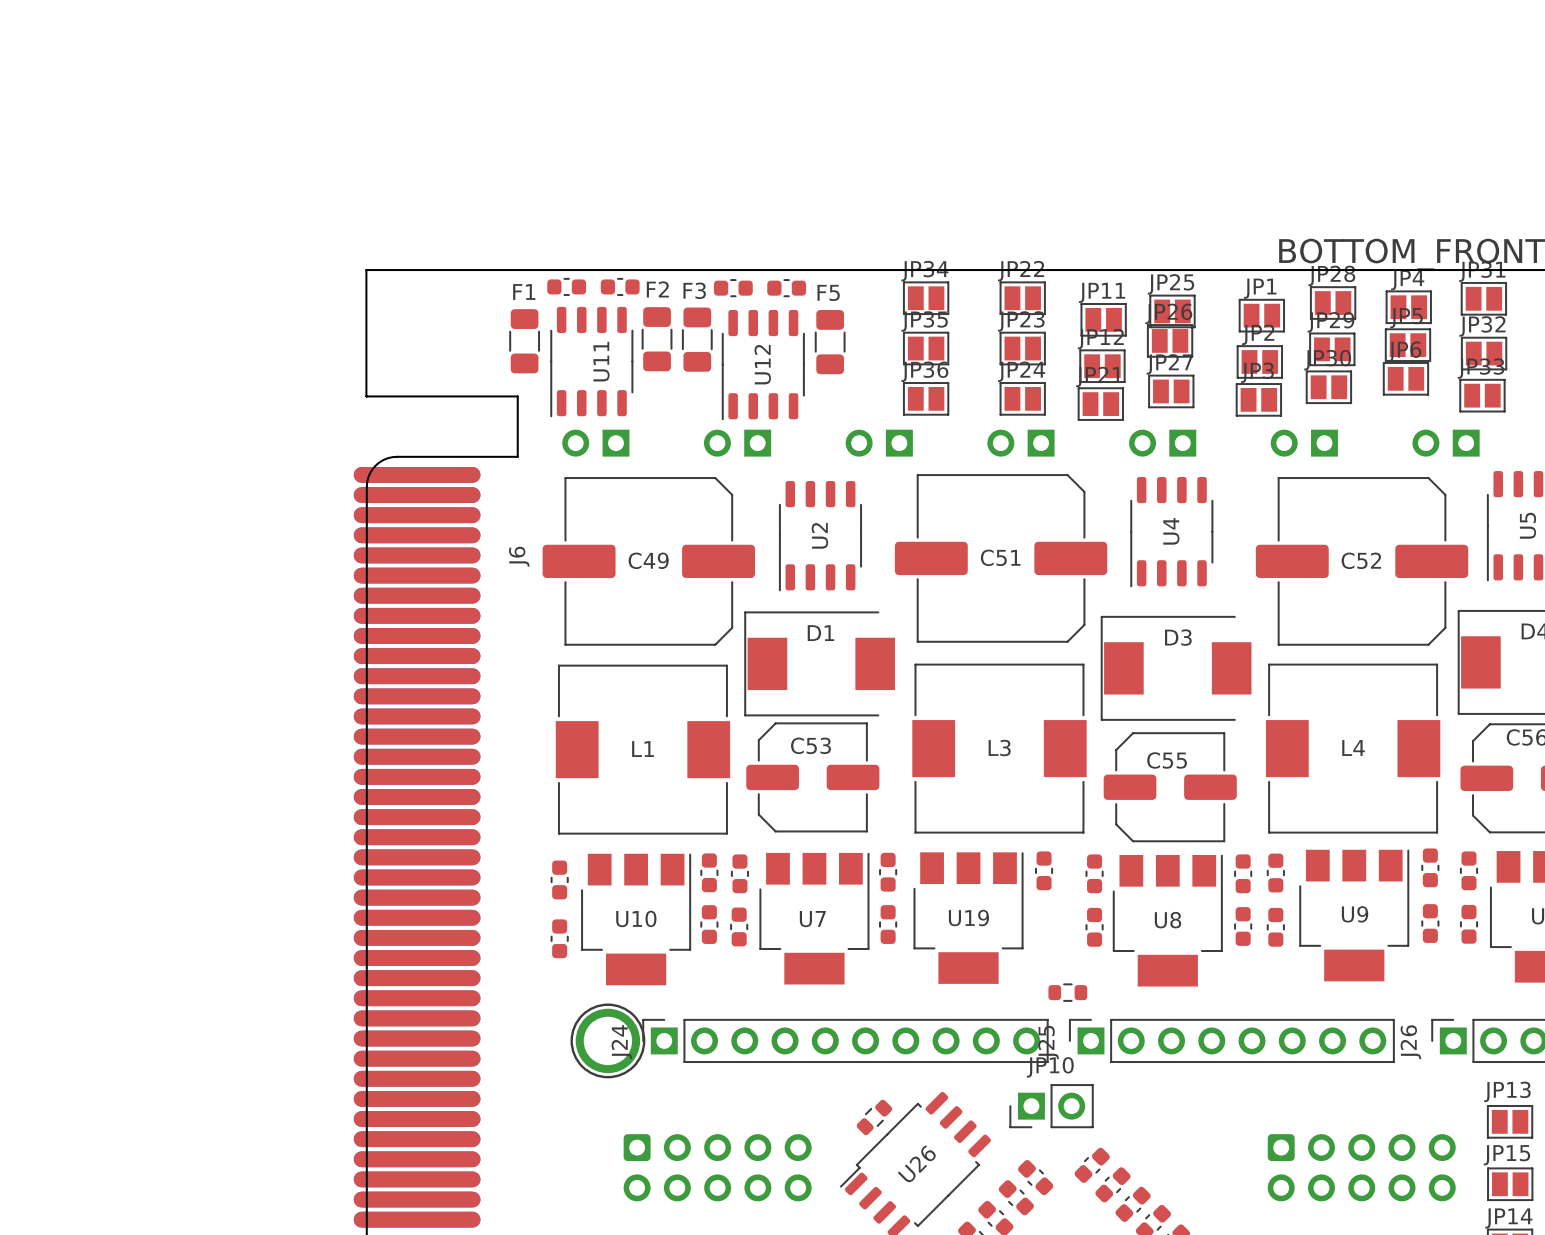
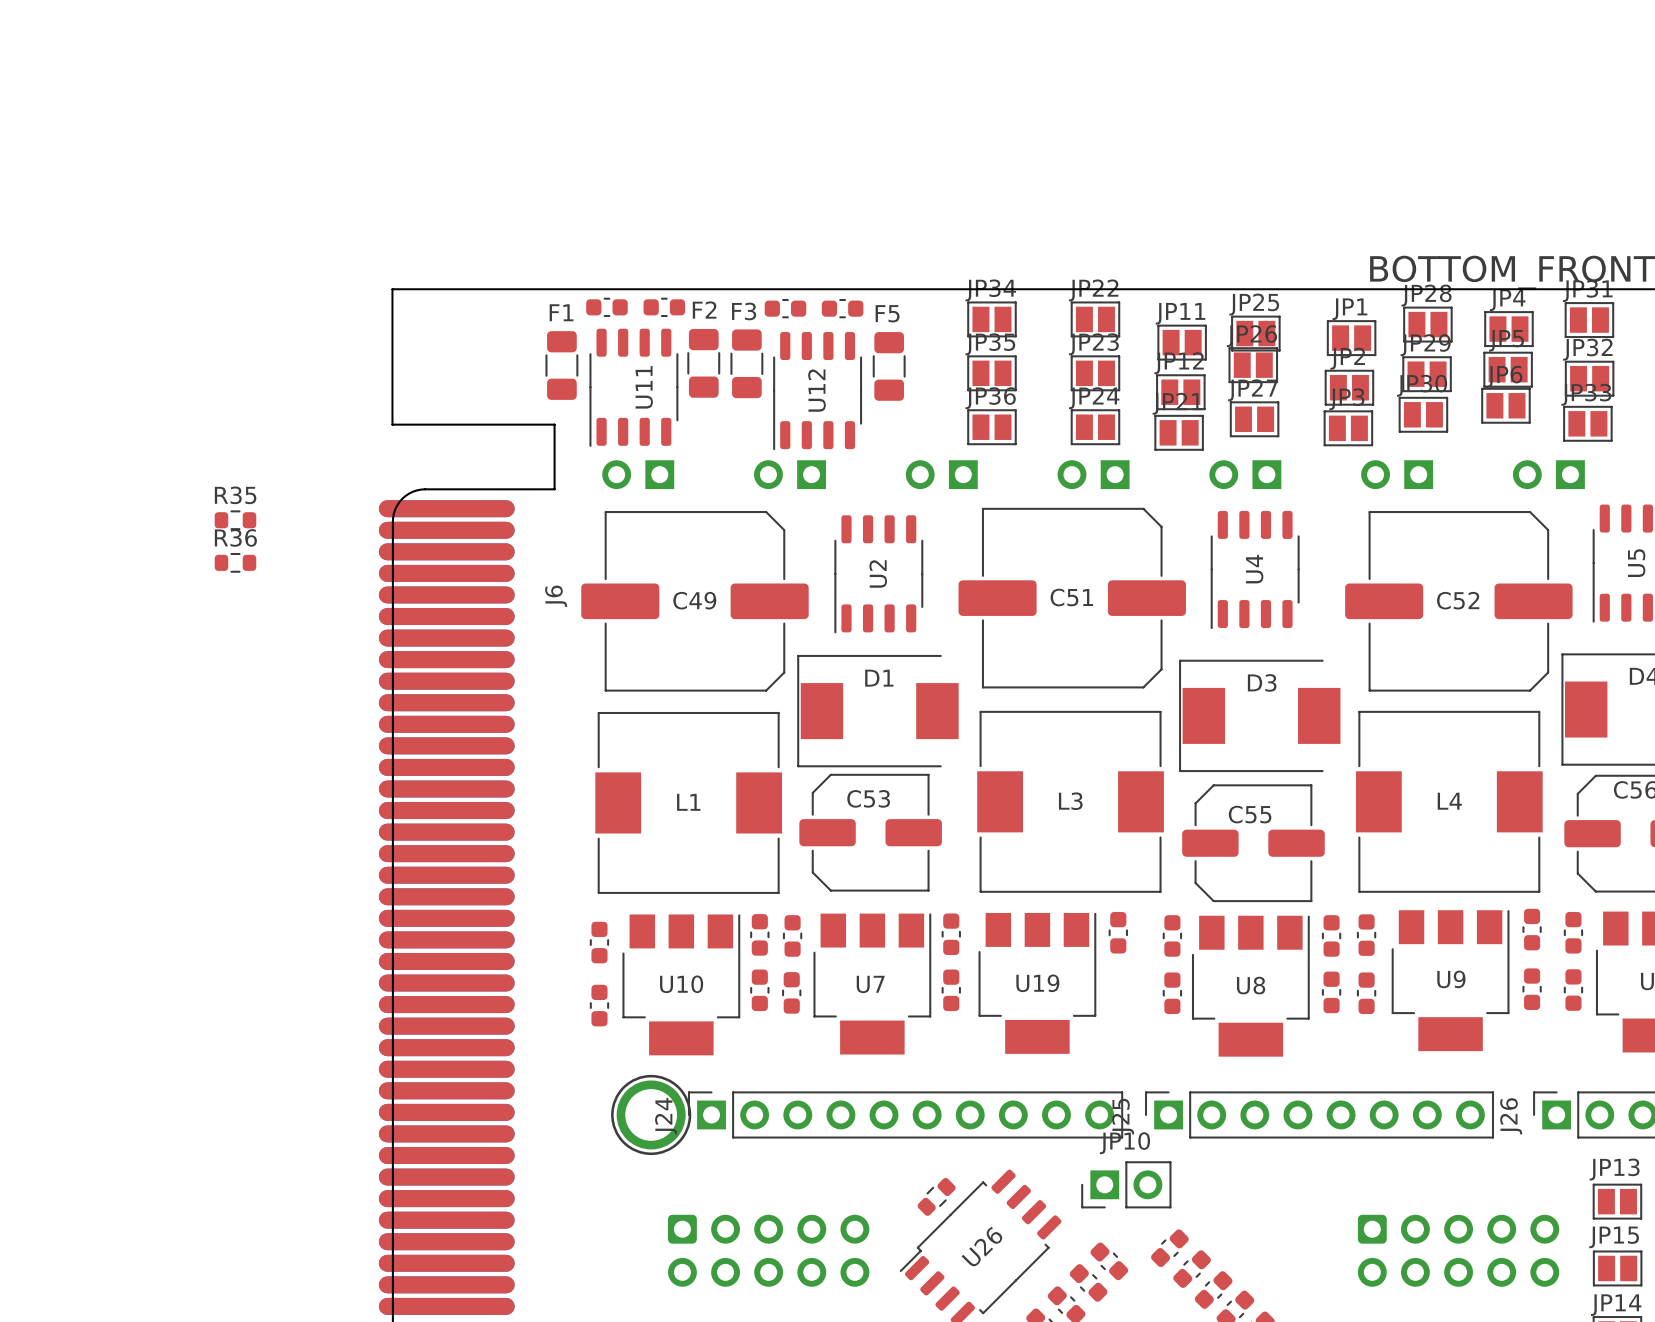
R35: none -> (235, 520)
R36: none -> (235, 562)
part: (1067, 992) -> none

